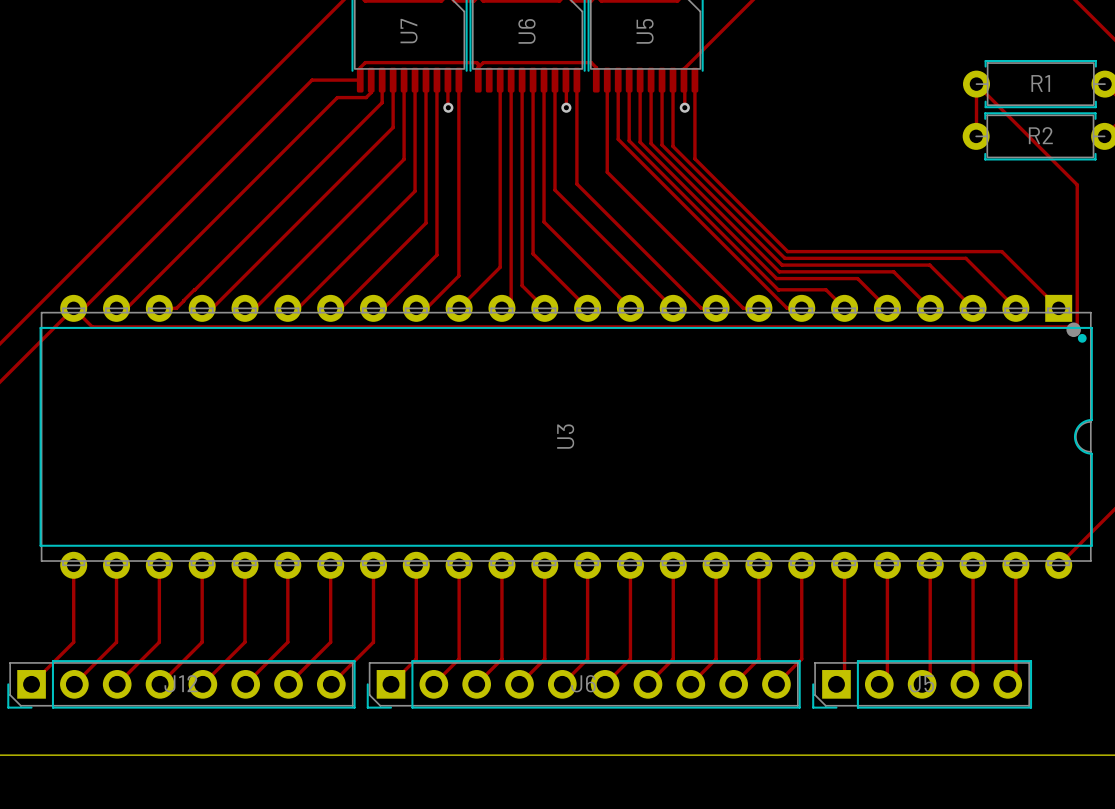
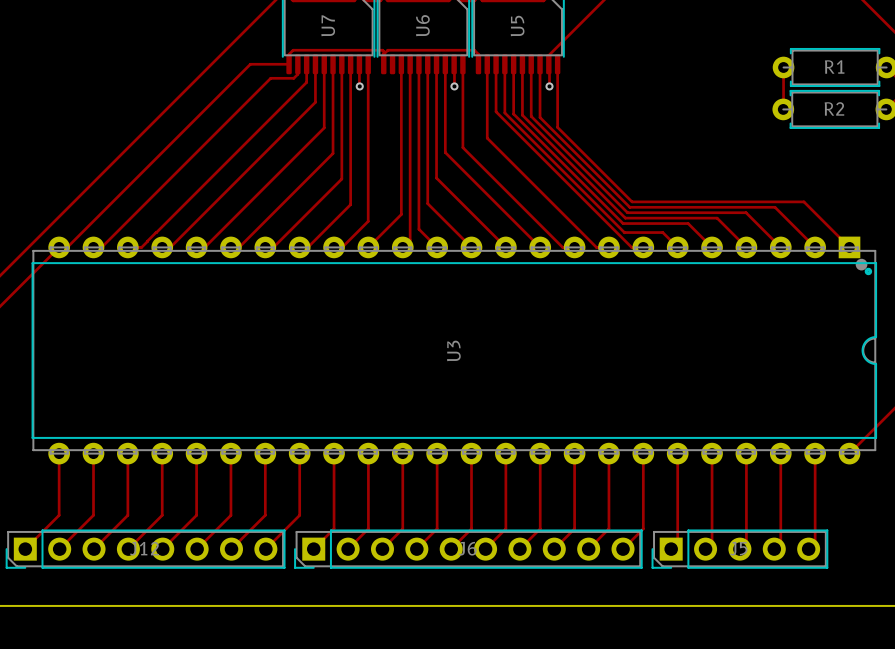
track: (976, 84) (1077, 184) (1077, 326) (92, 326) (73, 308) -> none

